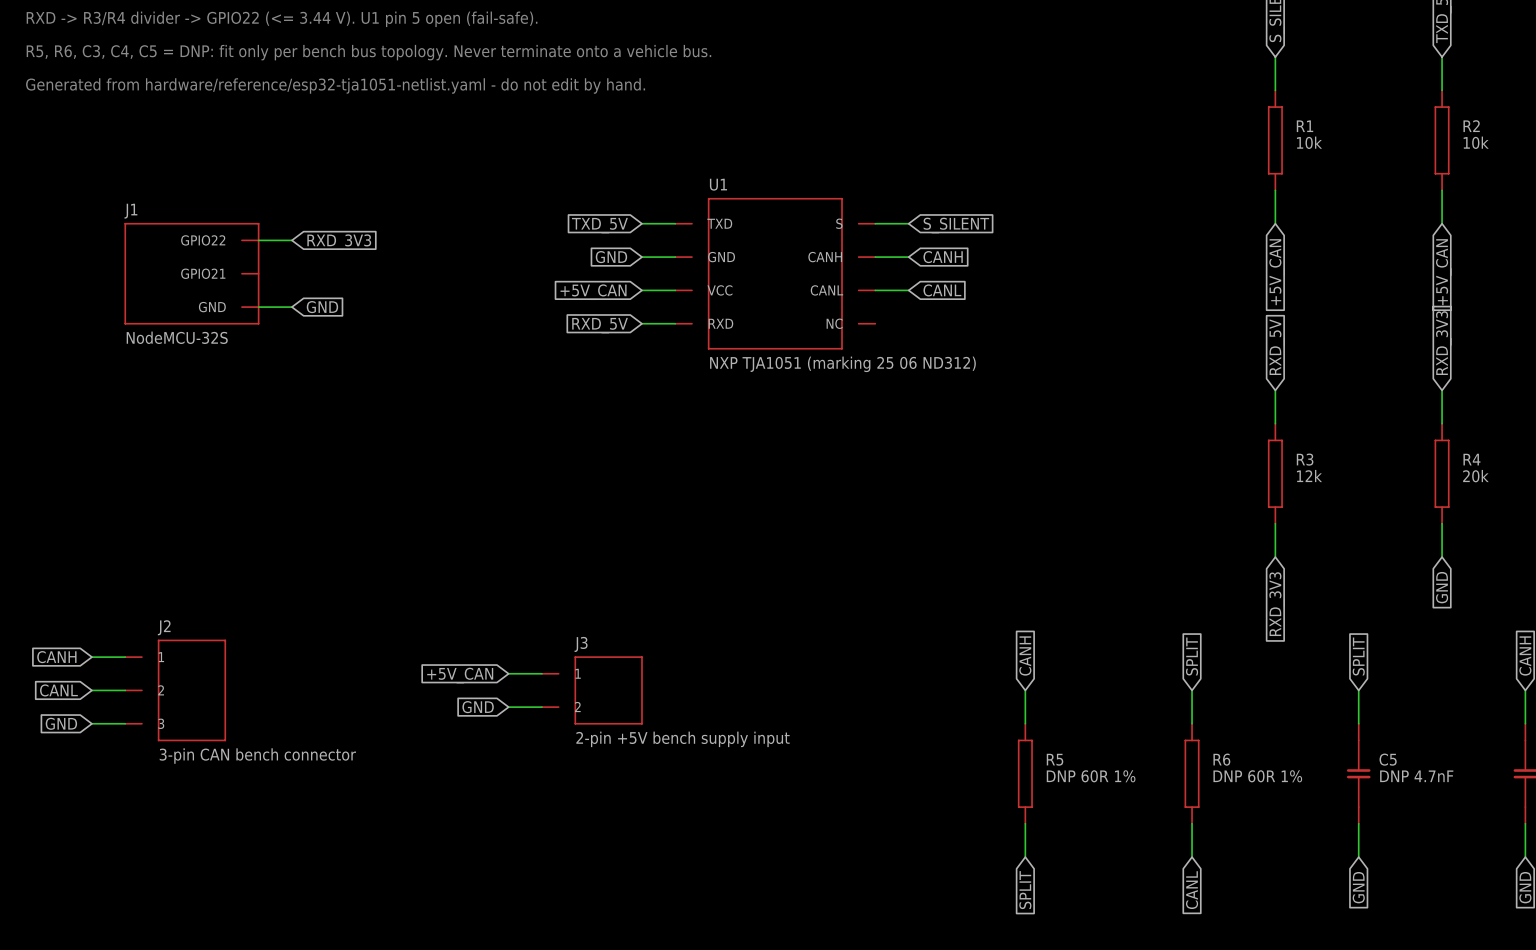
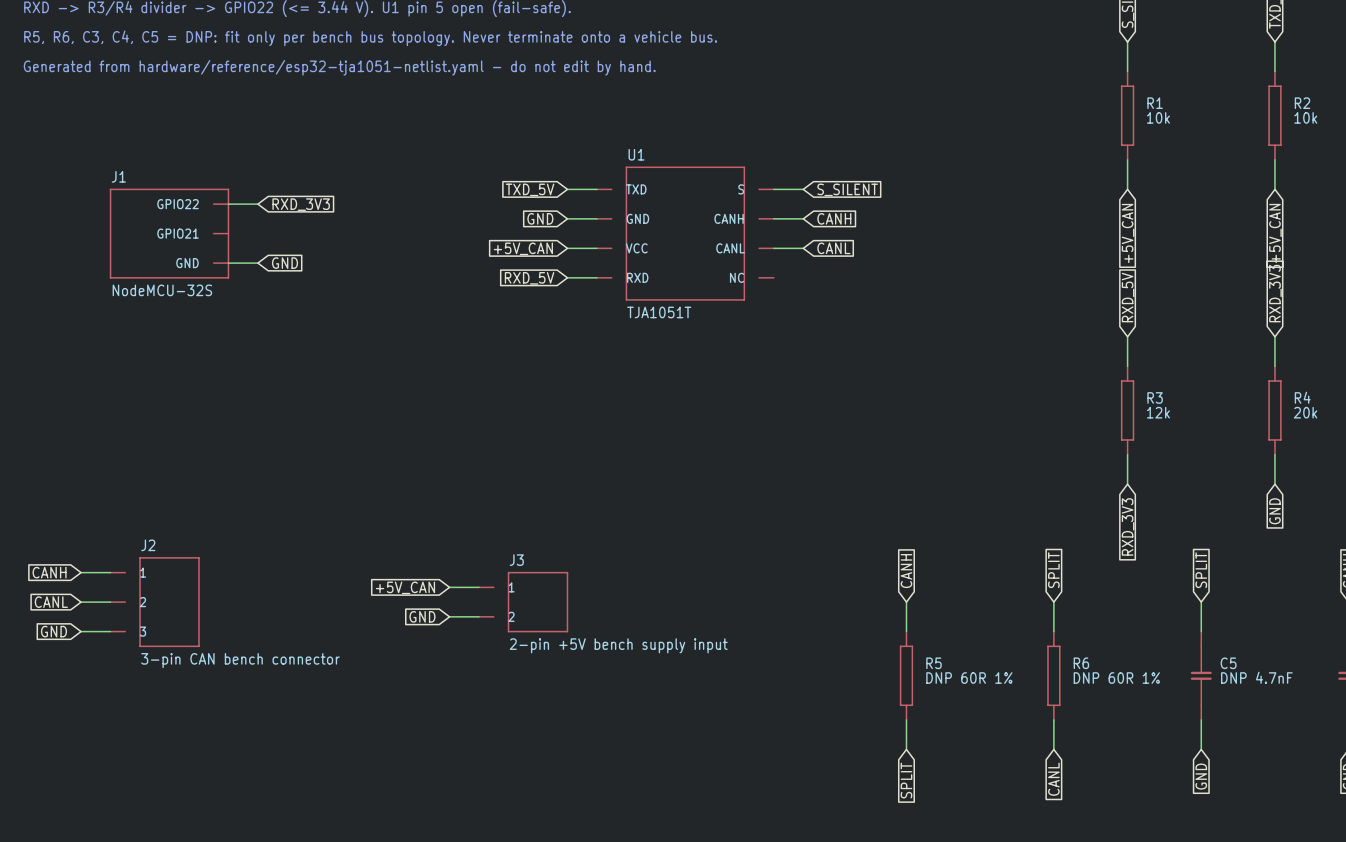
U1 value: NXP TJA1051 (marking 25 06 ND312) (842, 364) -> TJA1051T (659, 312)

